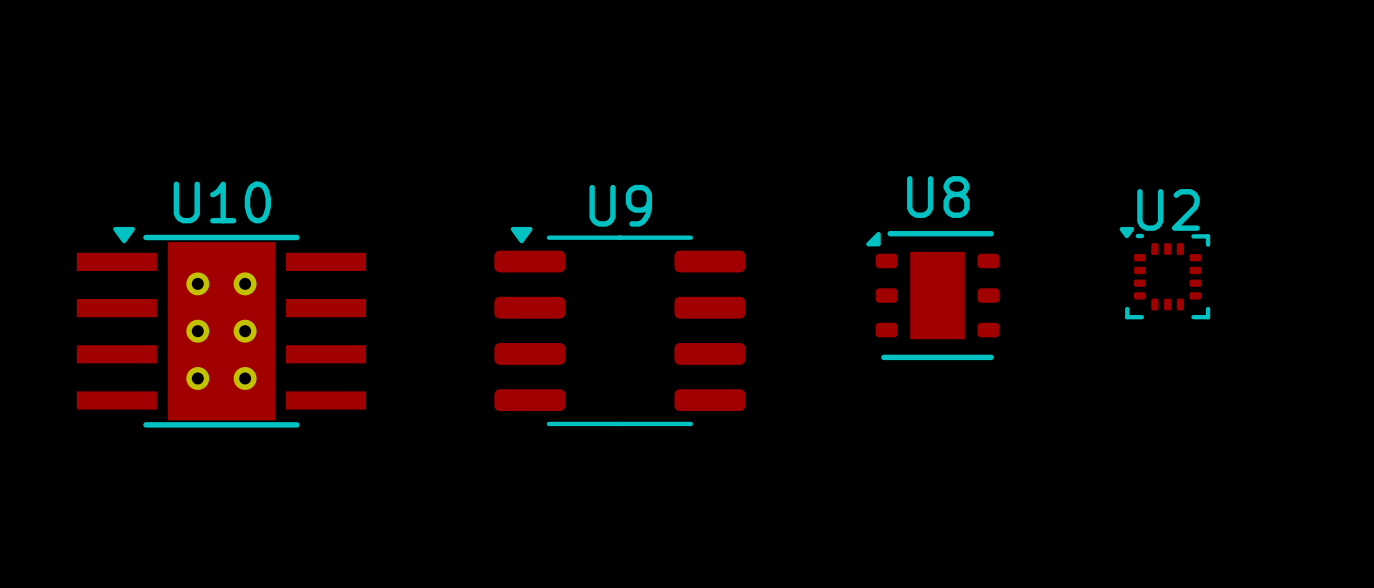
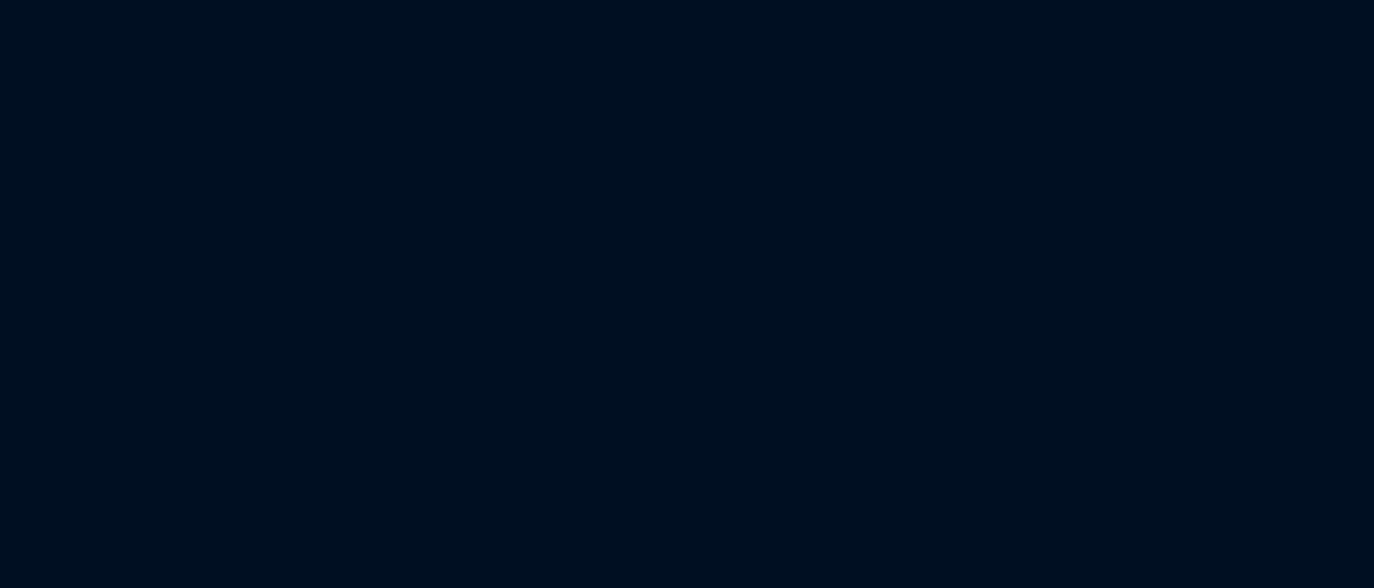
U2: (1164, 273) -> none
U8: (932, 295) -> none
U9: (619, 326) -> none
U10: (221, 327) -> none

